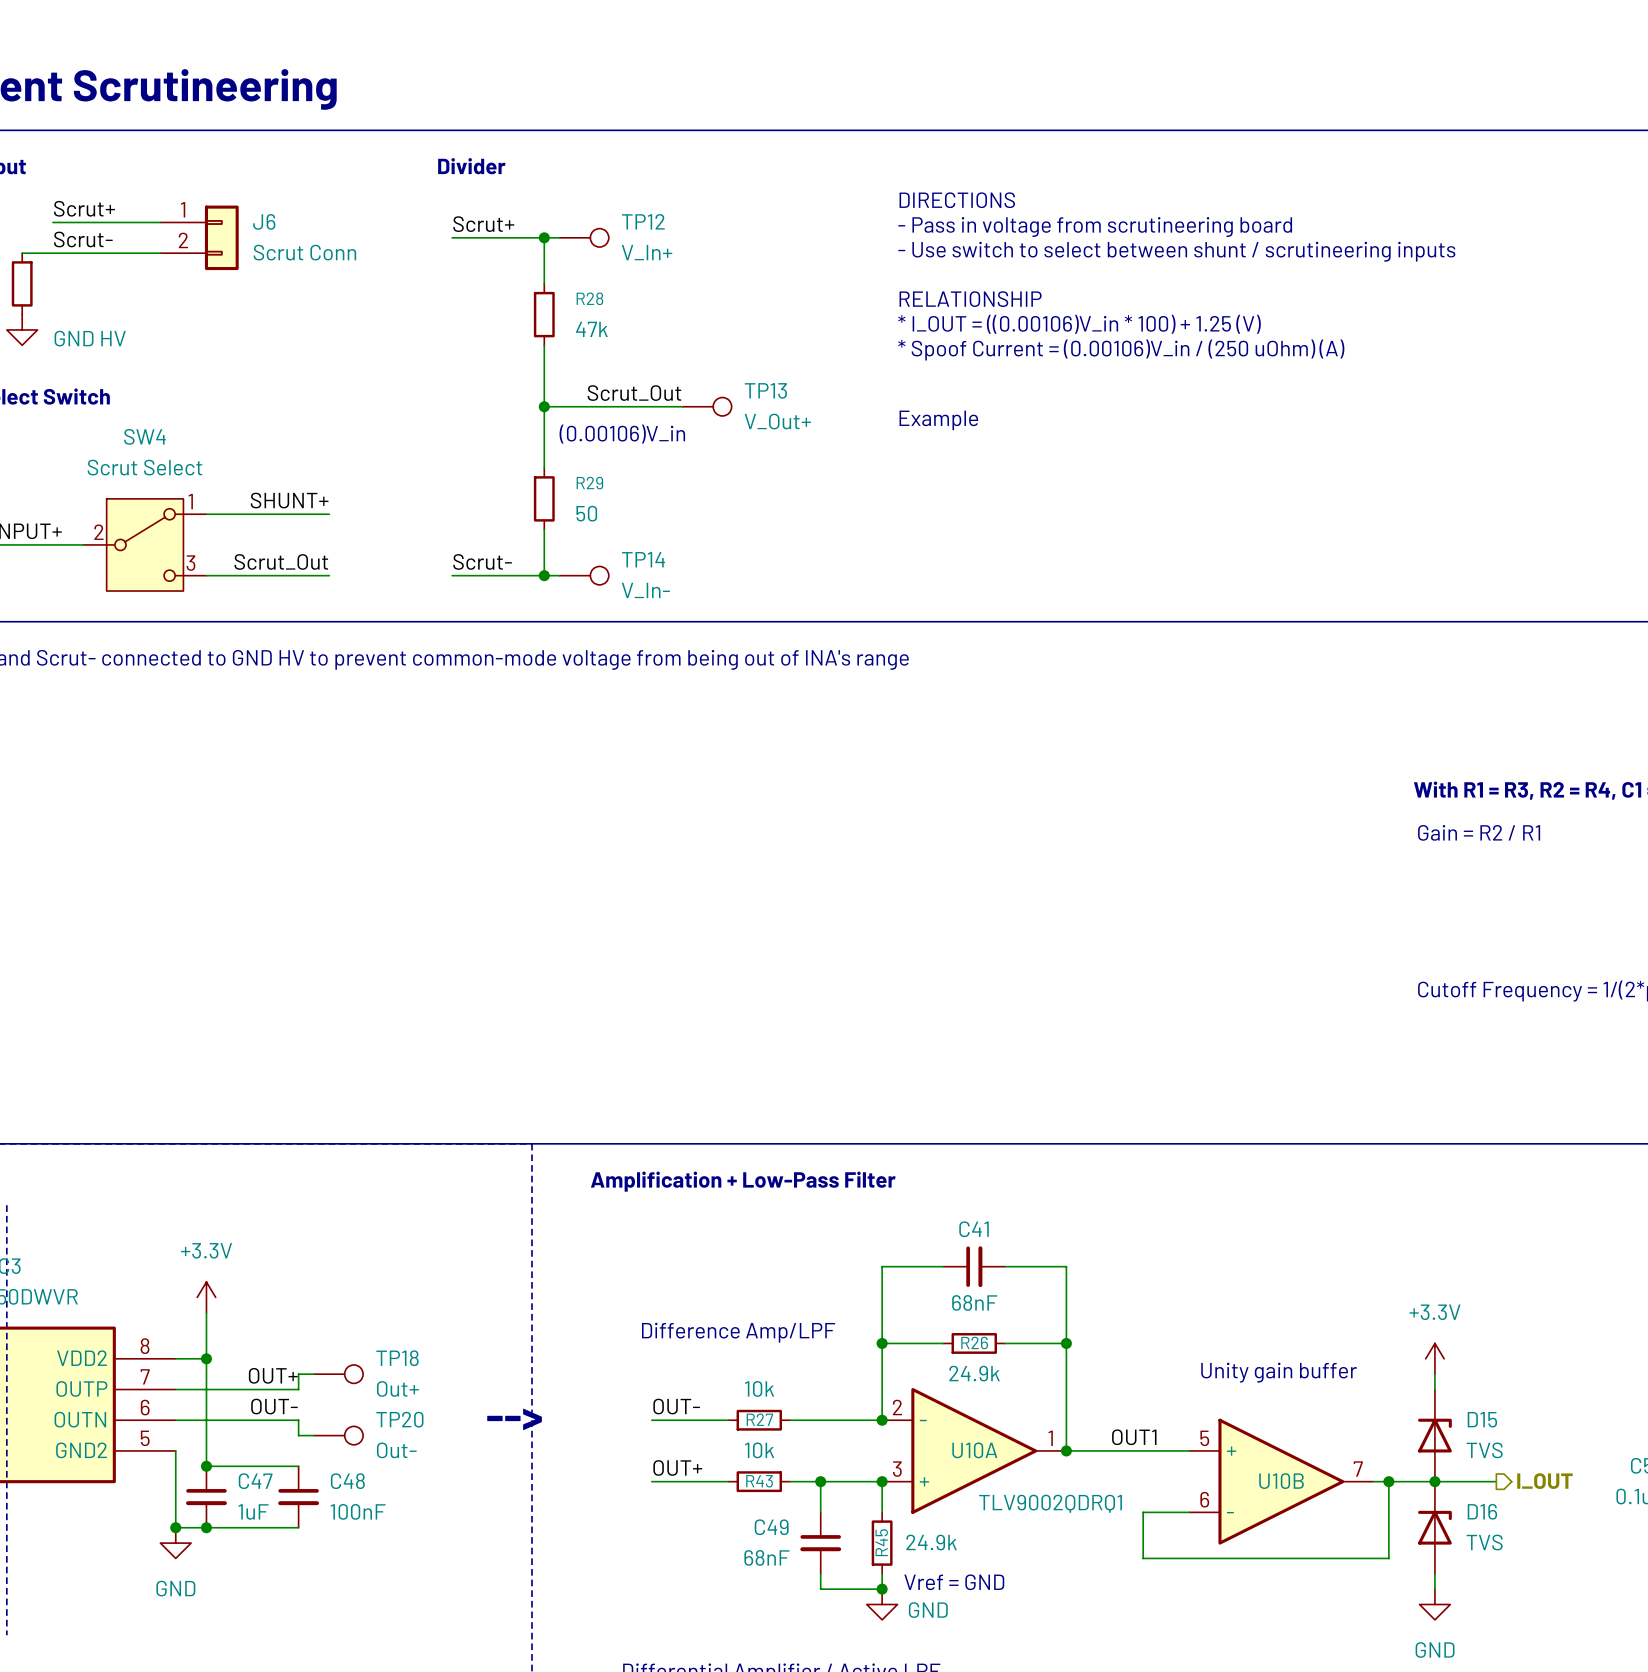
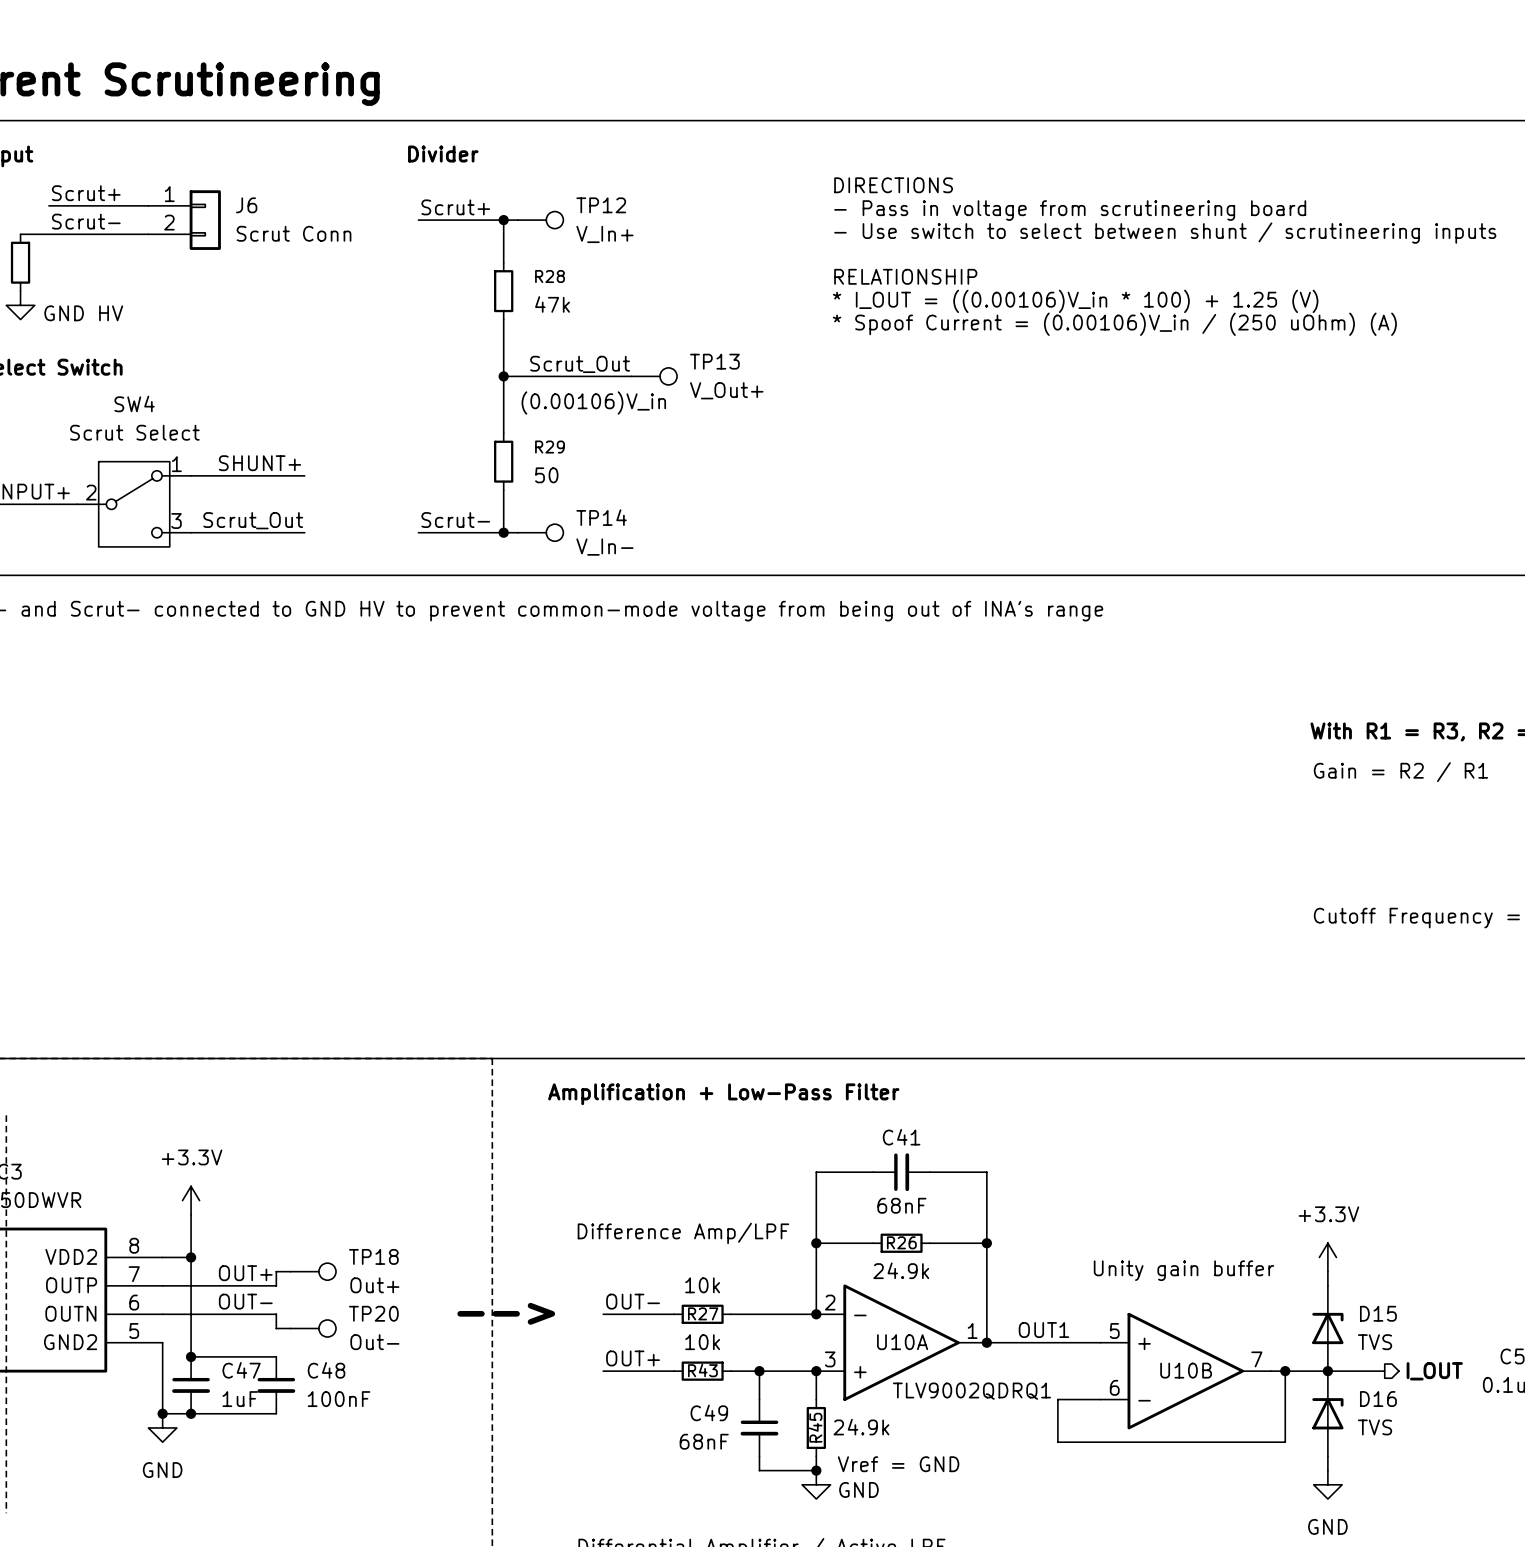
text: Example (938, 420) -> none

